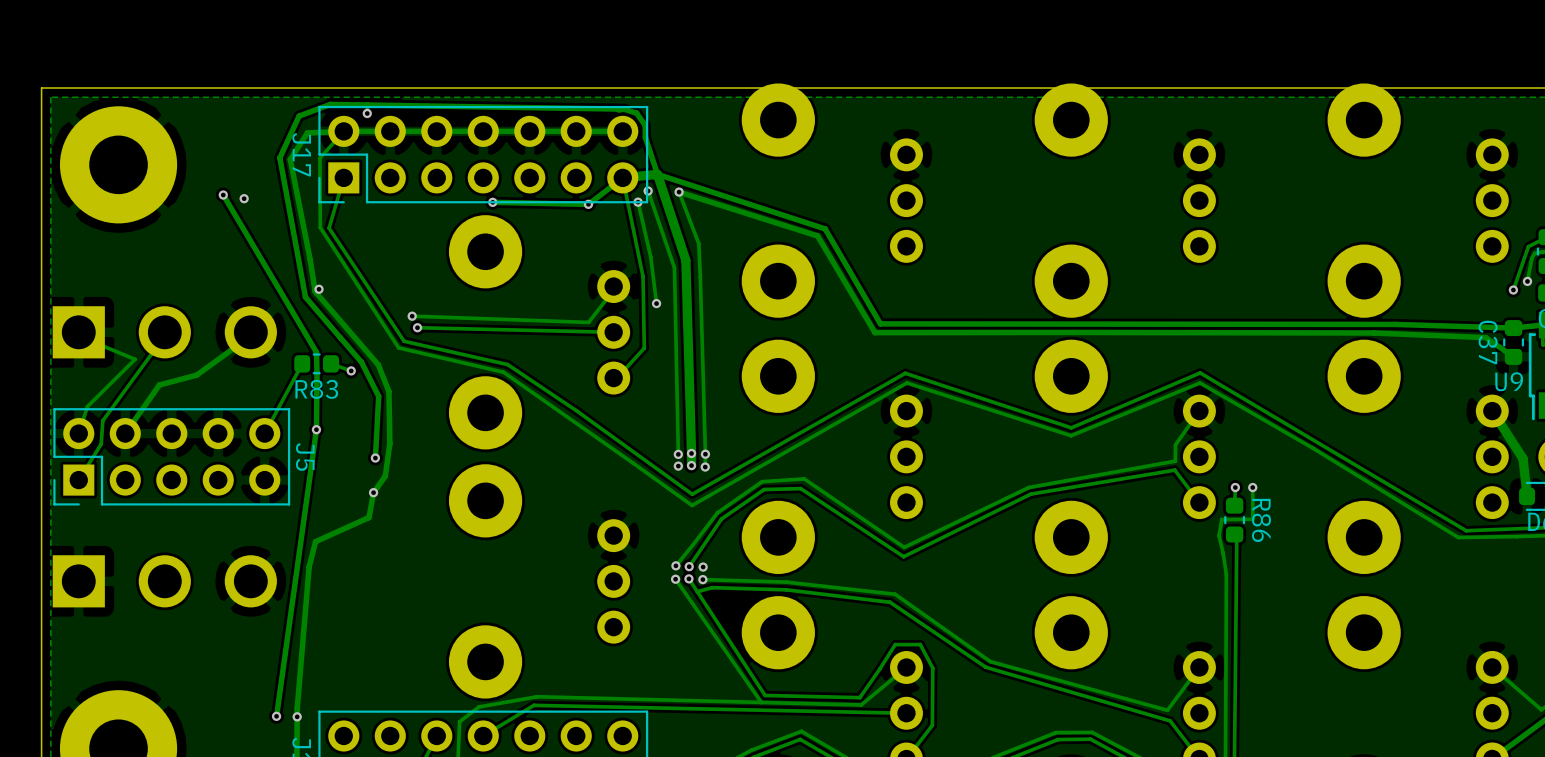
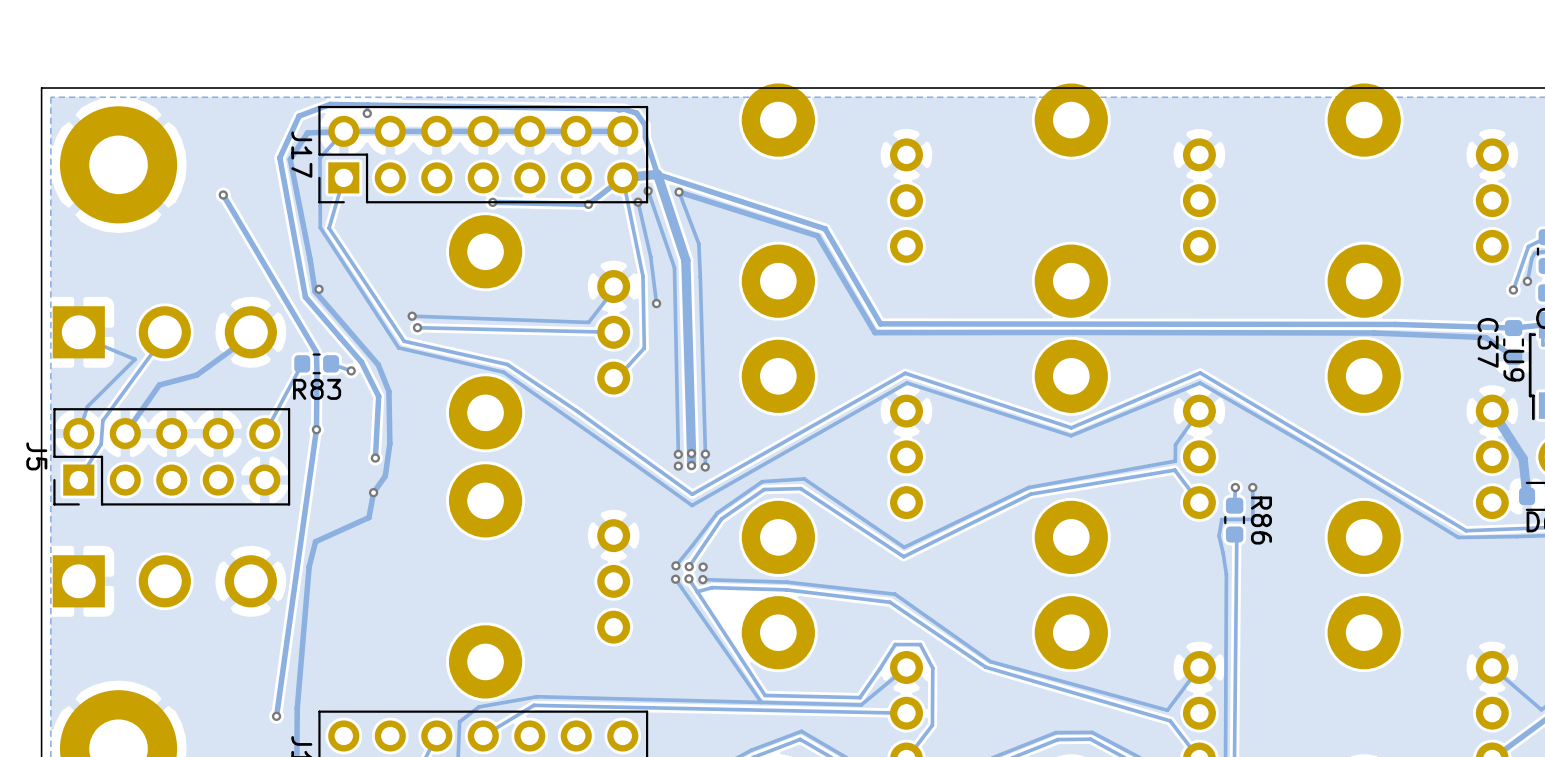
via: (244, 198) -> none
U9 name rotation: 0° (1509, 381) -> 90° clockwise (1513, 365)
J5 name position: J5 (305, 456) -> J5 (36, 456)
via: (297, 716) -> none

